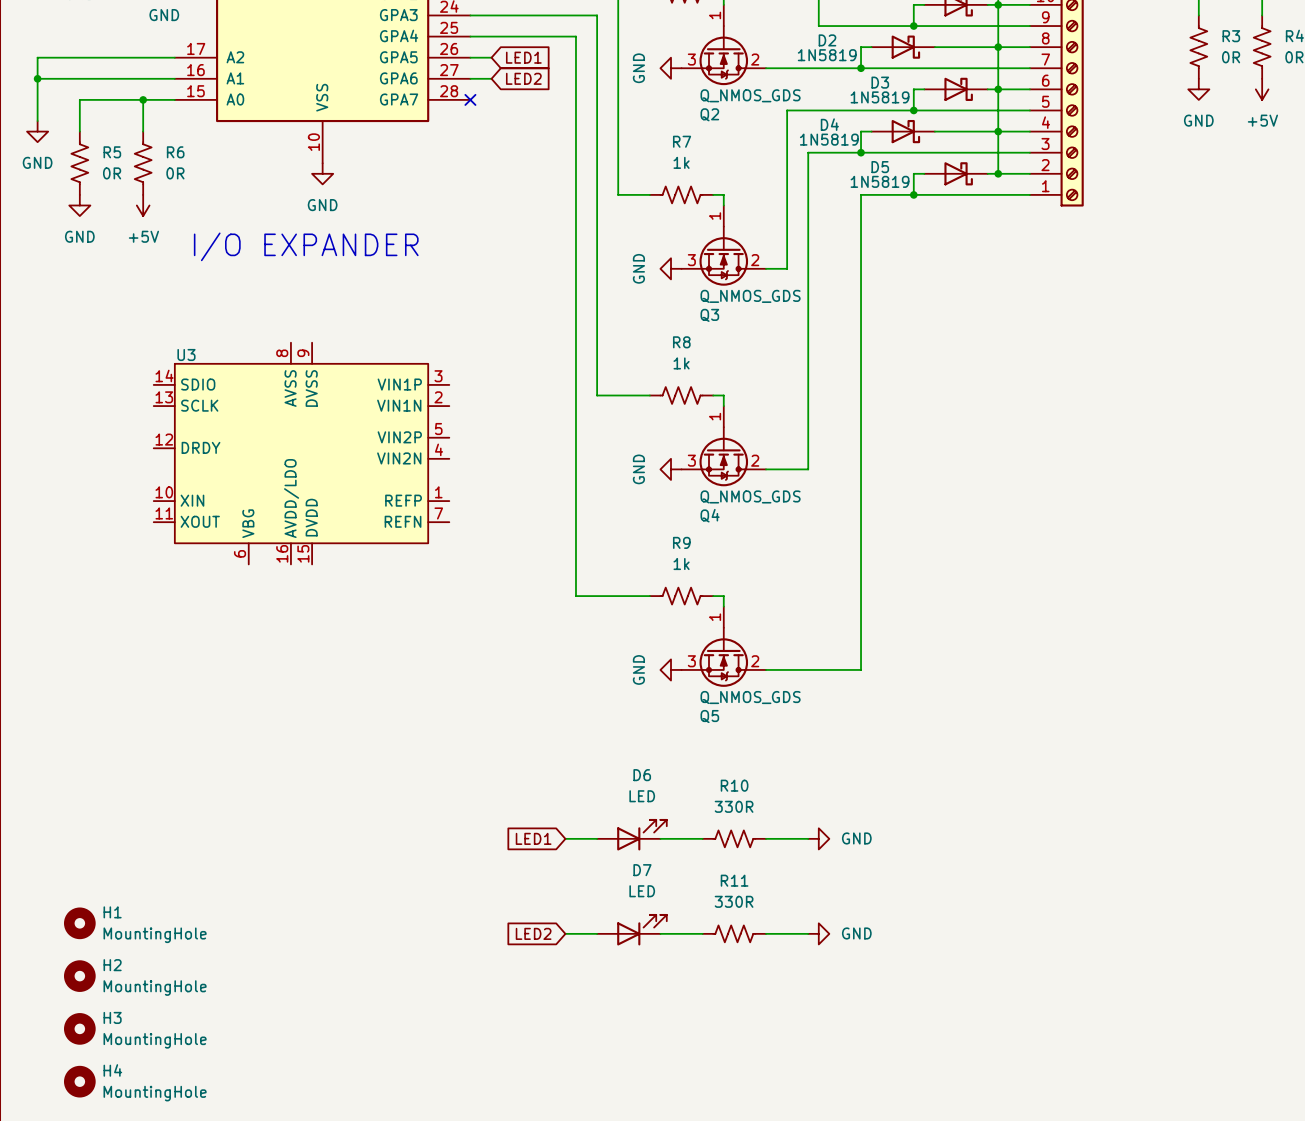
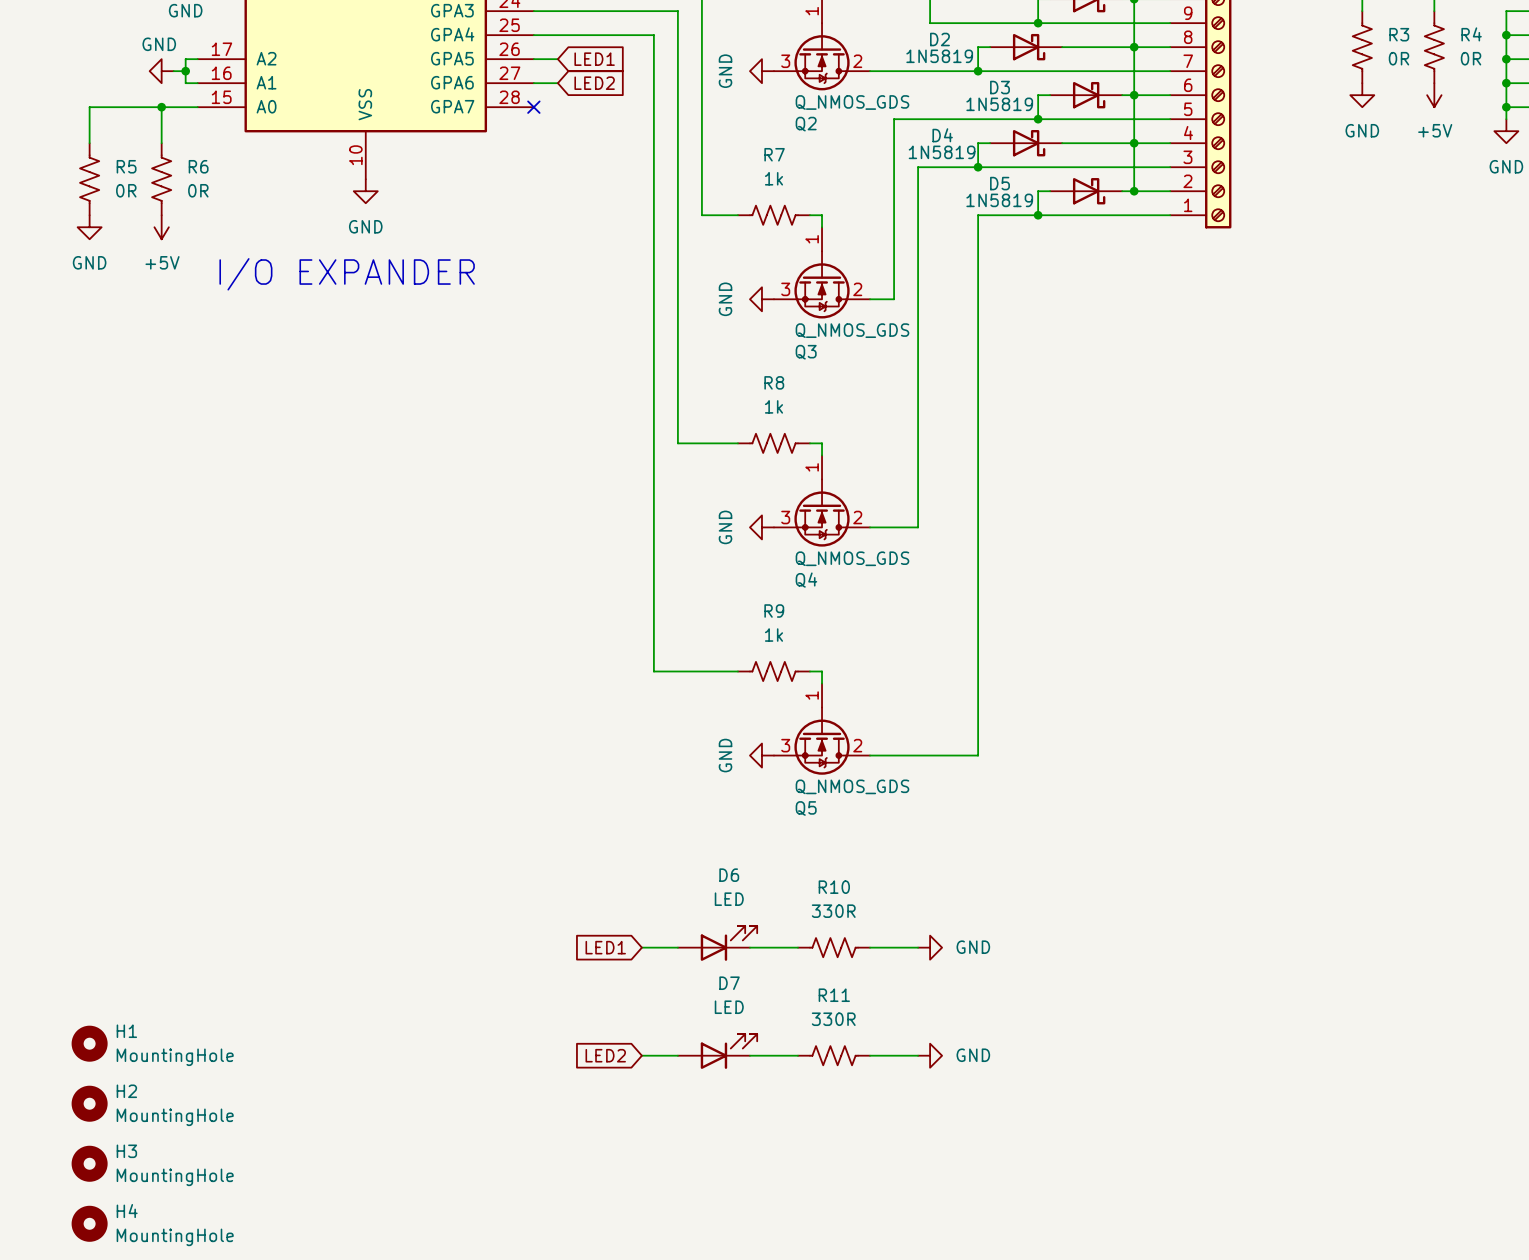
wire: (164, 57) (37, 57) (37, 121) -> none
wire: none -> (173, 71) (185, 71)
junction: none -> (185, 71)
wire: (37, 78) (164, 78) -> (185, 59) (185, 83)
junction: (37, 78) -> none
power symbol rotation: 0° (37, 131) -> 90° clockwise (161, 71)
power symbol position: GND (37, 131) -> GND (161, 71)
power symbol text position: GND (37, 162) -> GND (159, 44)
U3: (301, 453) -> none

